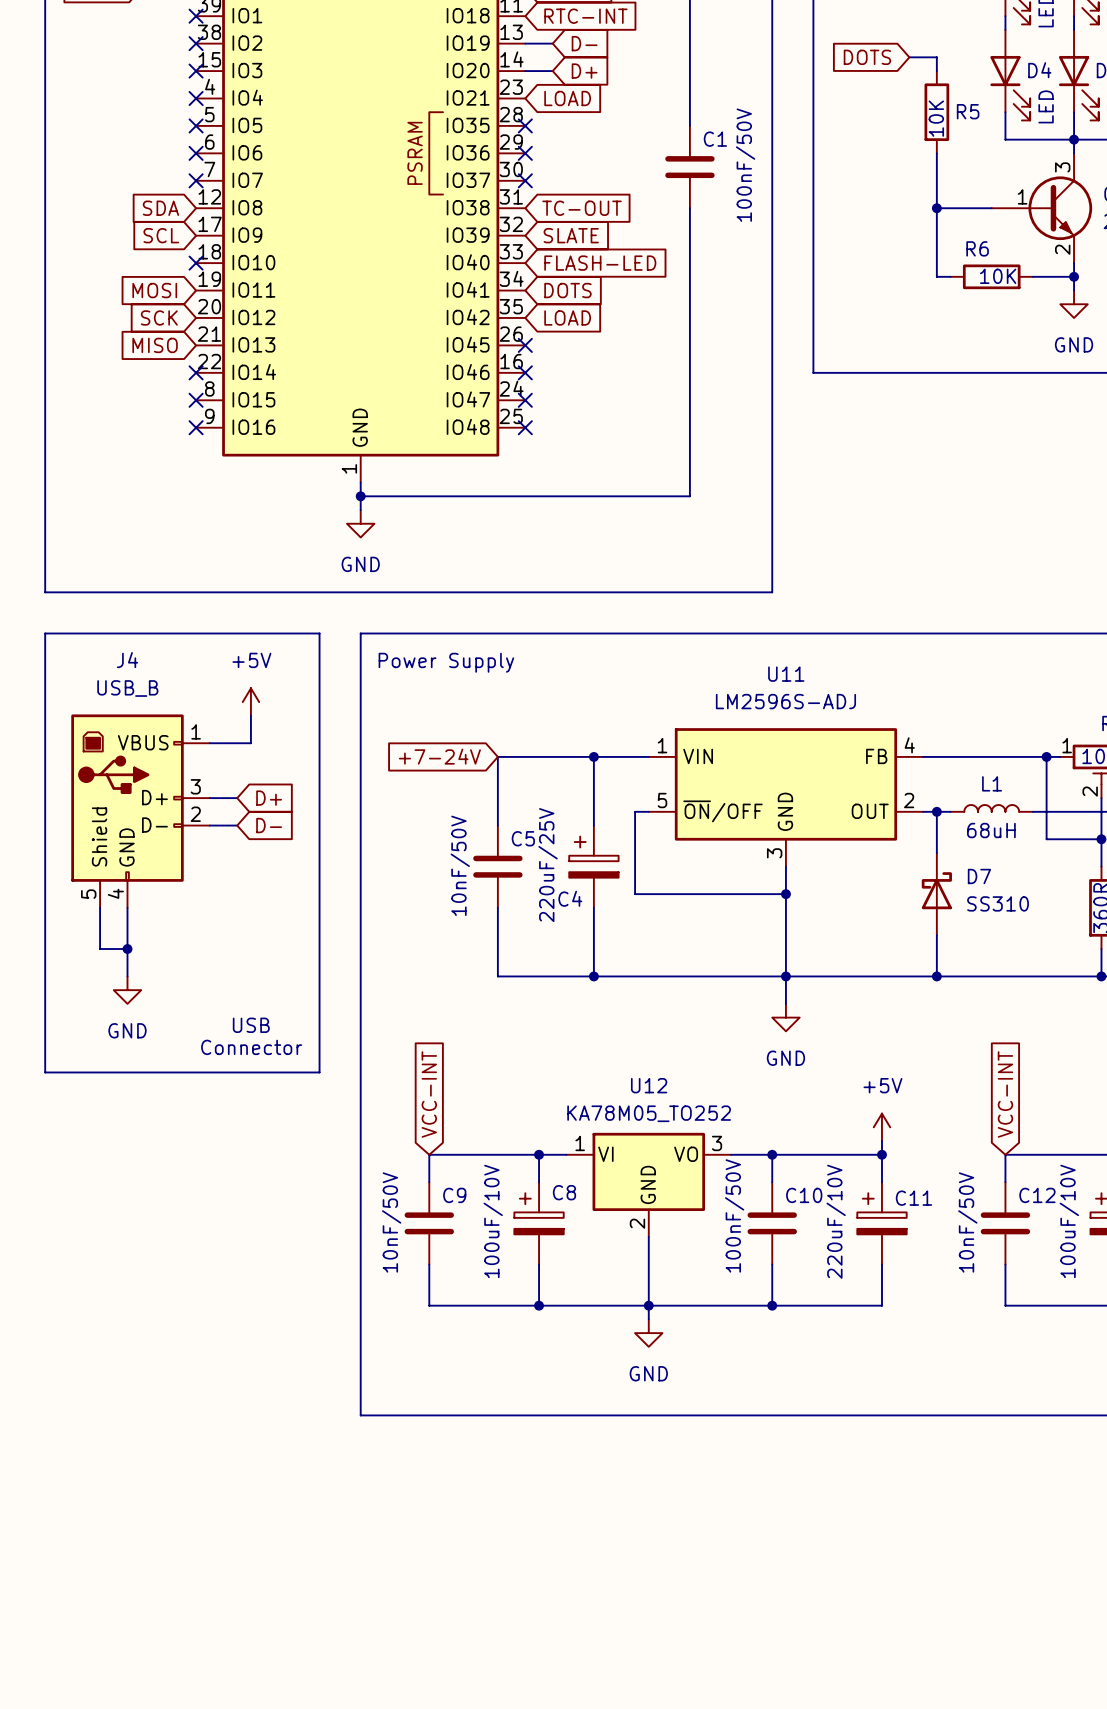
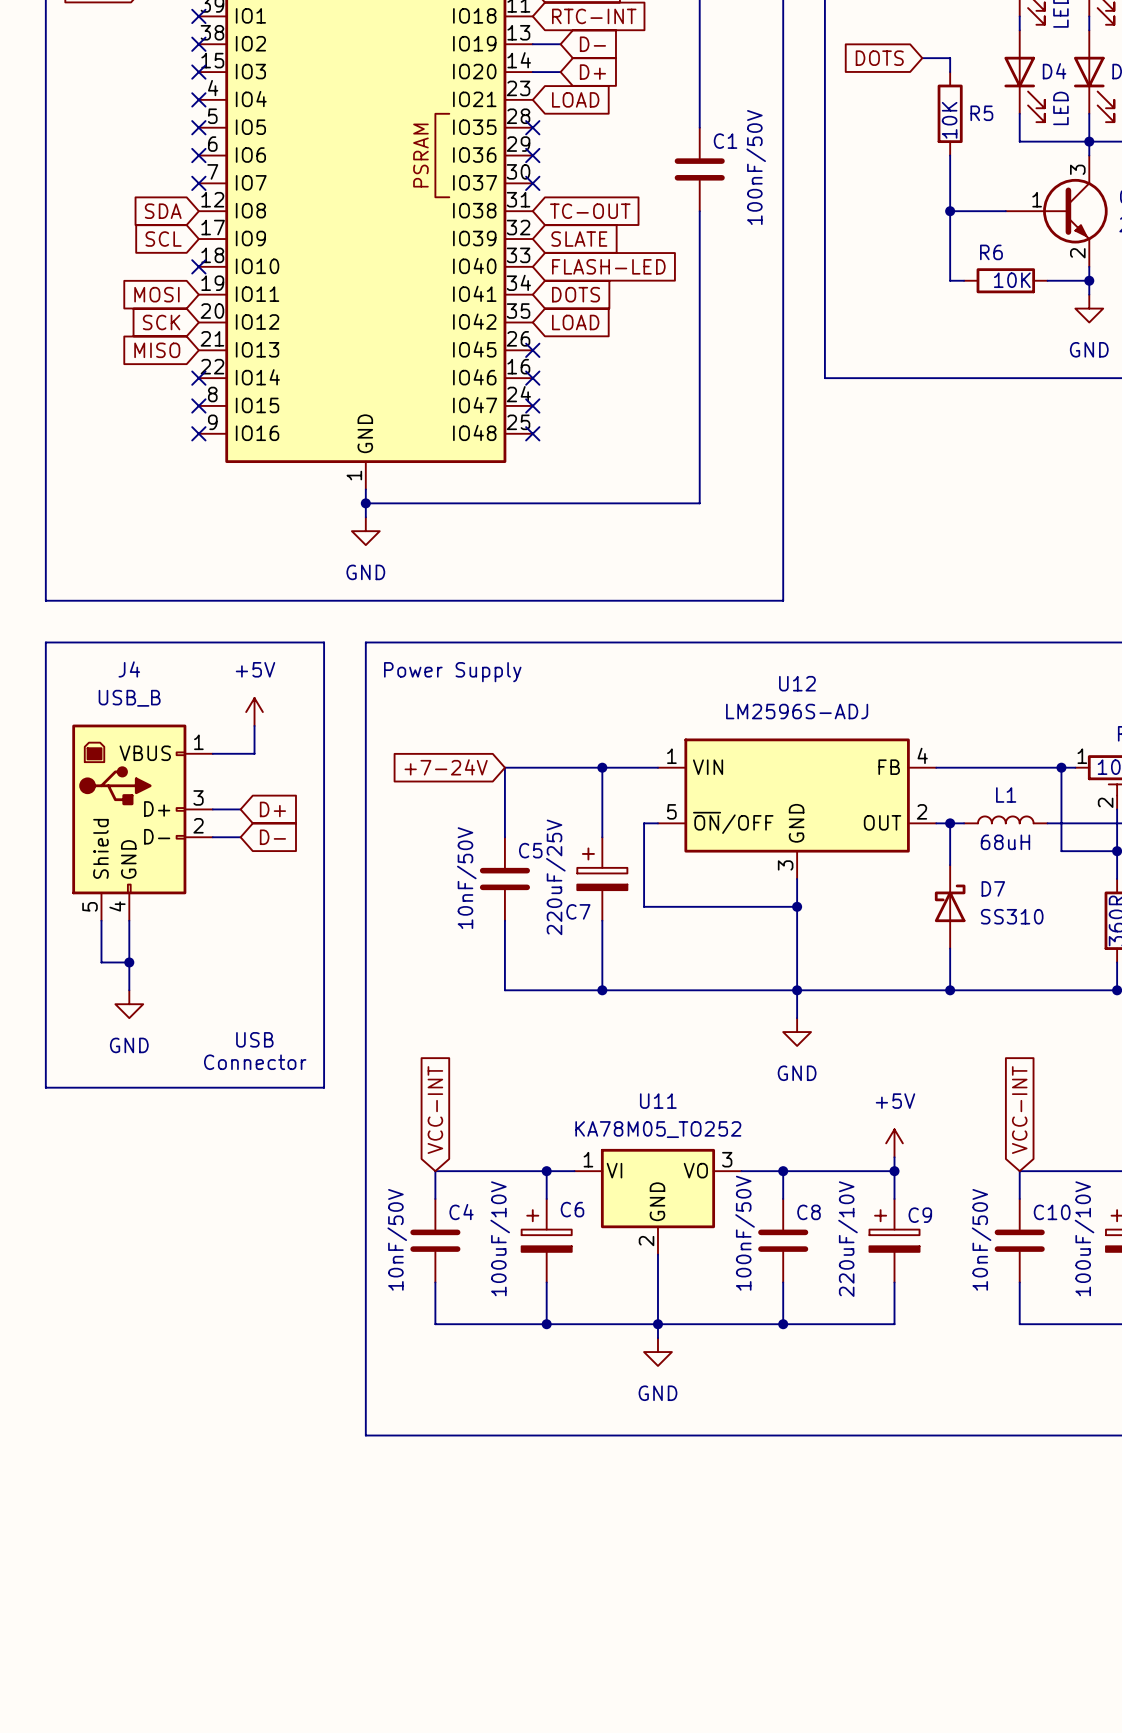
U11 name: U11 (786, 674) -> U12 (797, 683)
C4 name: C4 (570, 898) -> C7 (578, 911)
U12 name: U12 (649, 1085) -> U11 (658, 1101)
C8 name: C8 (564, 1192) -> C6 (572, 1209)
C9 name: C9 (454, 1195) -> C4 (461, 1212)
C10 name: C10 (804, 1195) -> C8 (809, 1212)
C12 name: C12 (1037, 1195) -> C10 (1052, 1212)
C11 name: C11 (913, 1198) -> C9 (920, 1215)

